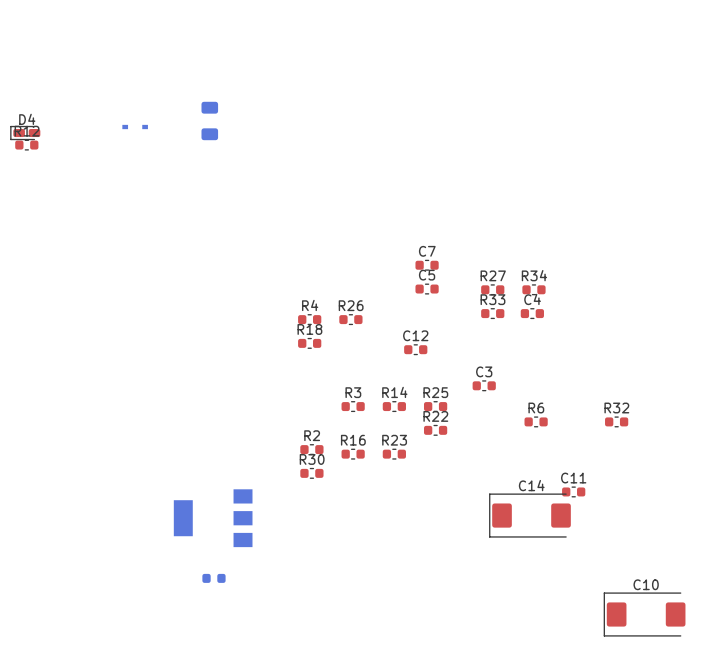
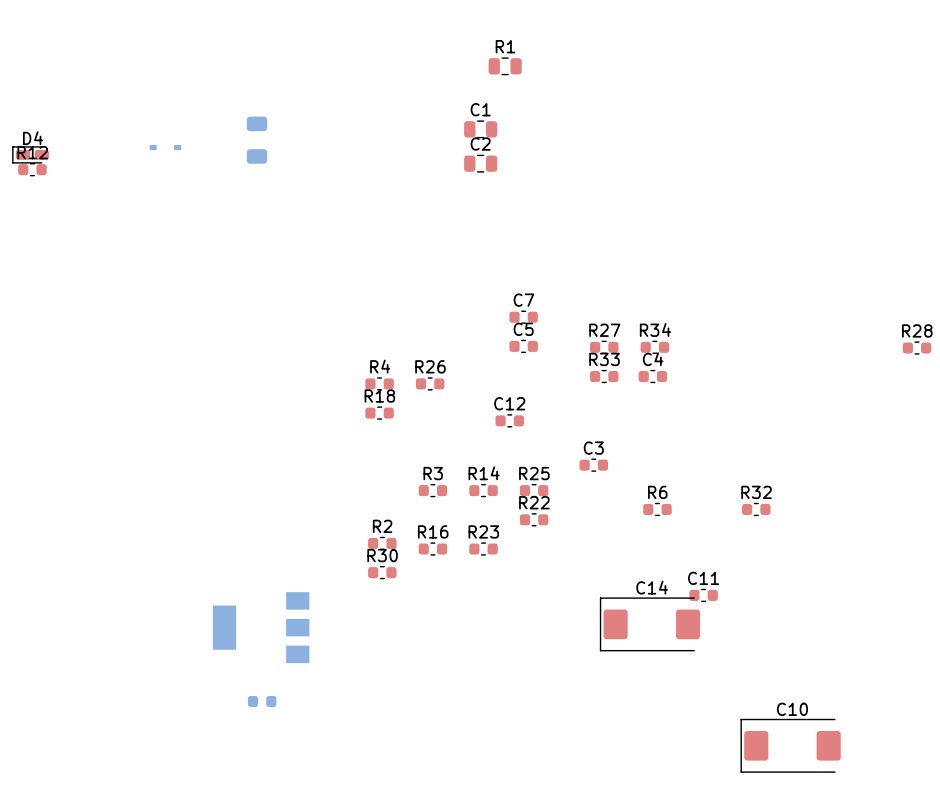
R1: none -> (505, 66)
C1: none -> (480, 129)
C2: none -> (480, 163)

